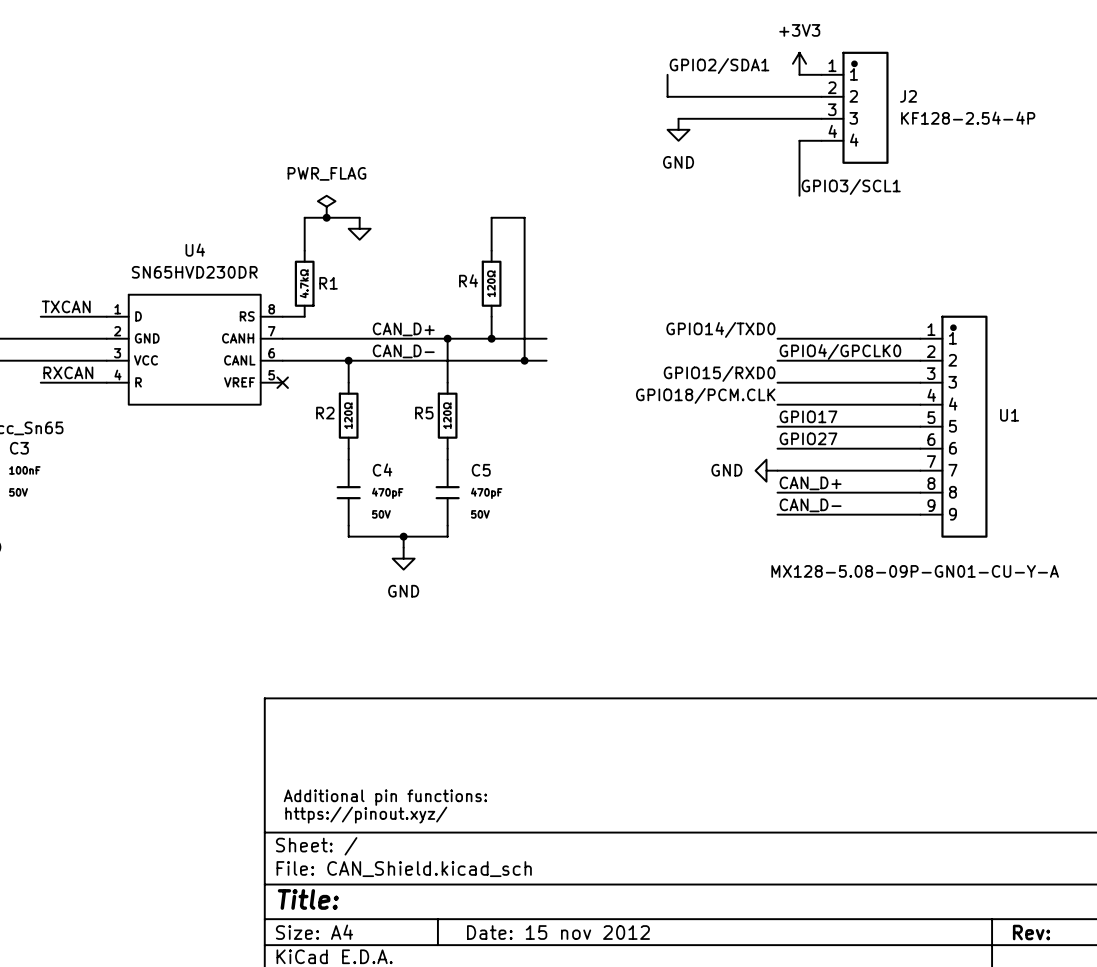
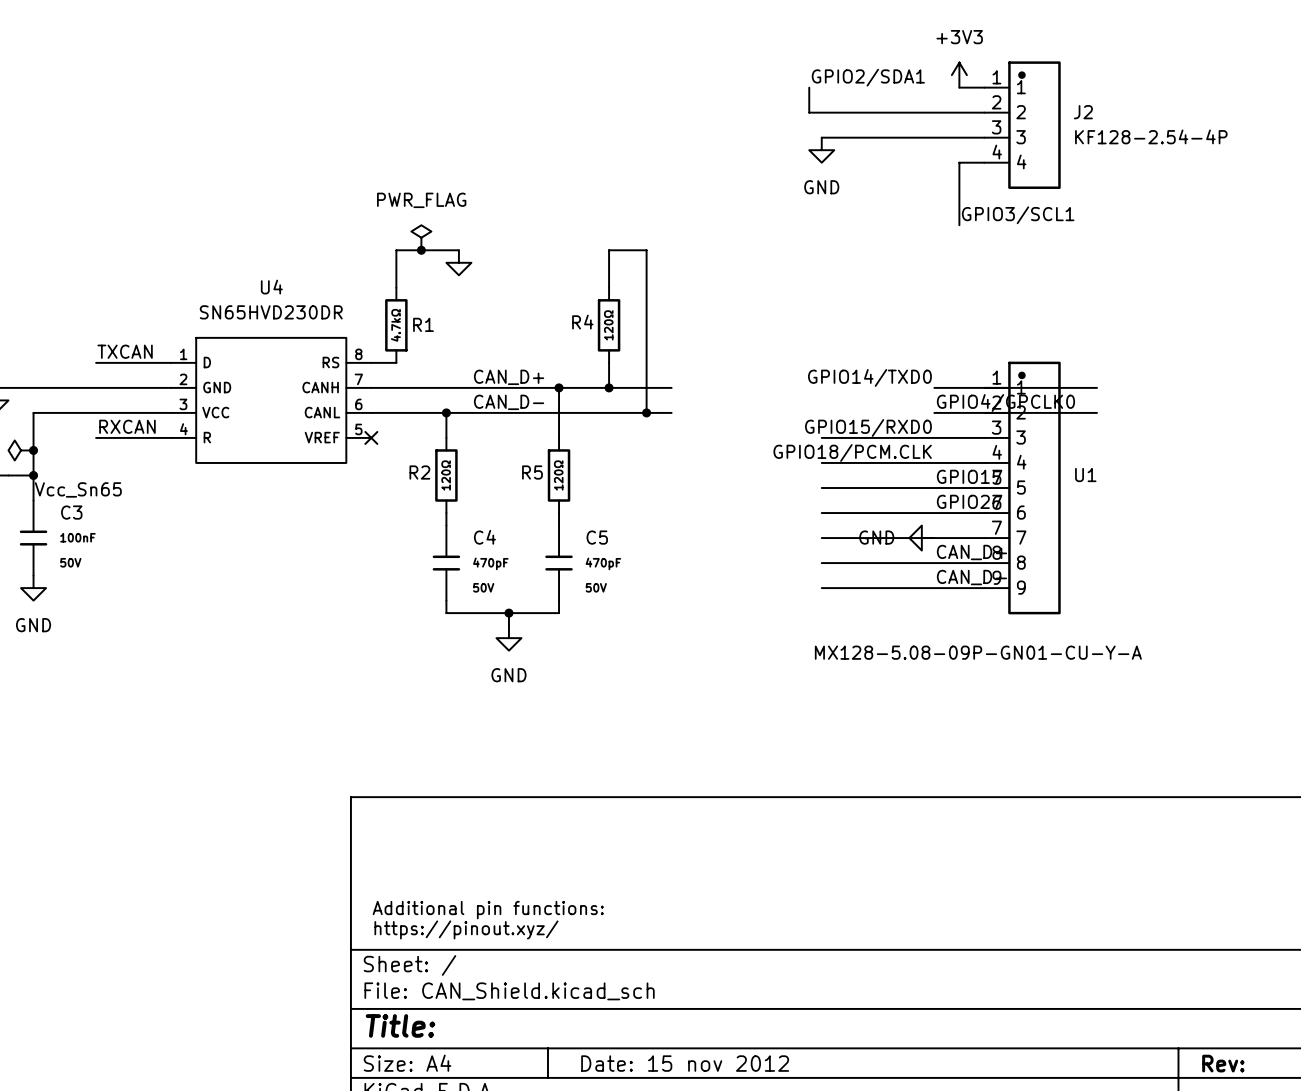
wire: (821, 382) (920, 382) -> (821, 437) (934, 437)
wire: (821, 404) (920, 404) -> (821, 462) (934, 462)
wire: (821, 426) (920, 426) -> (821, 488) (934, 488)
U1 position: (954, 426) -> (1022, 488)
wire: (821, 448) (920, 448) -> (821, 513) (934, 513)
wire: (821, 470) (920, 470) -> (821, 538) (934, 538)
wire: (821, 492) (920, 492) -> (821, 563) (934, 563)
wire: (821, 514) (920, 514) -> (821, 588) (934, 588)

